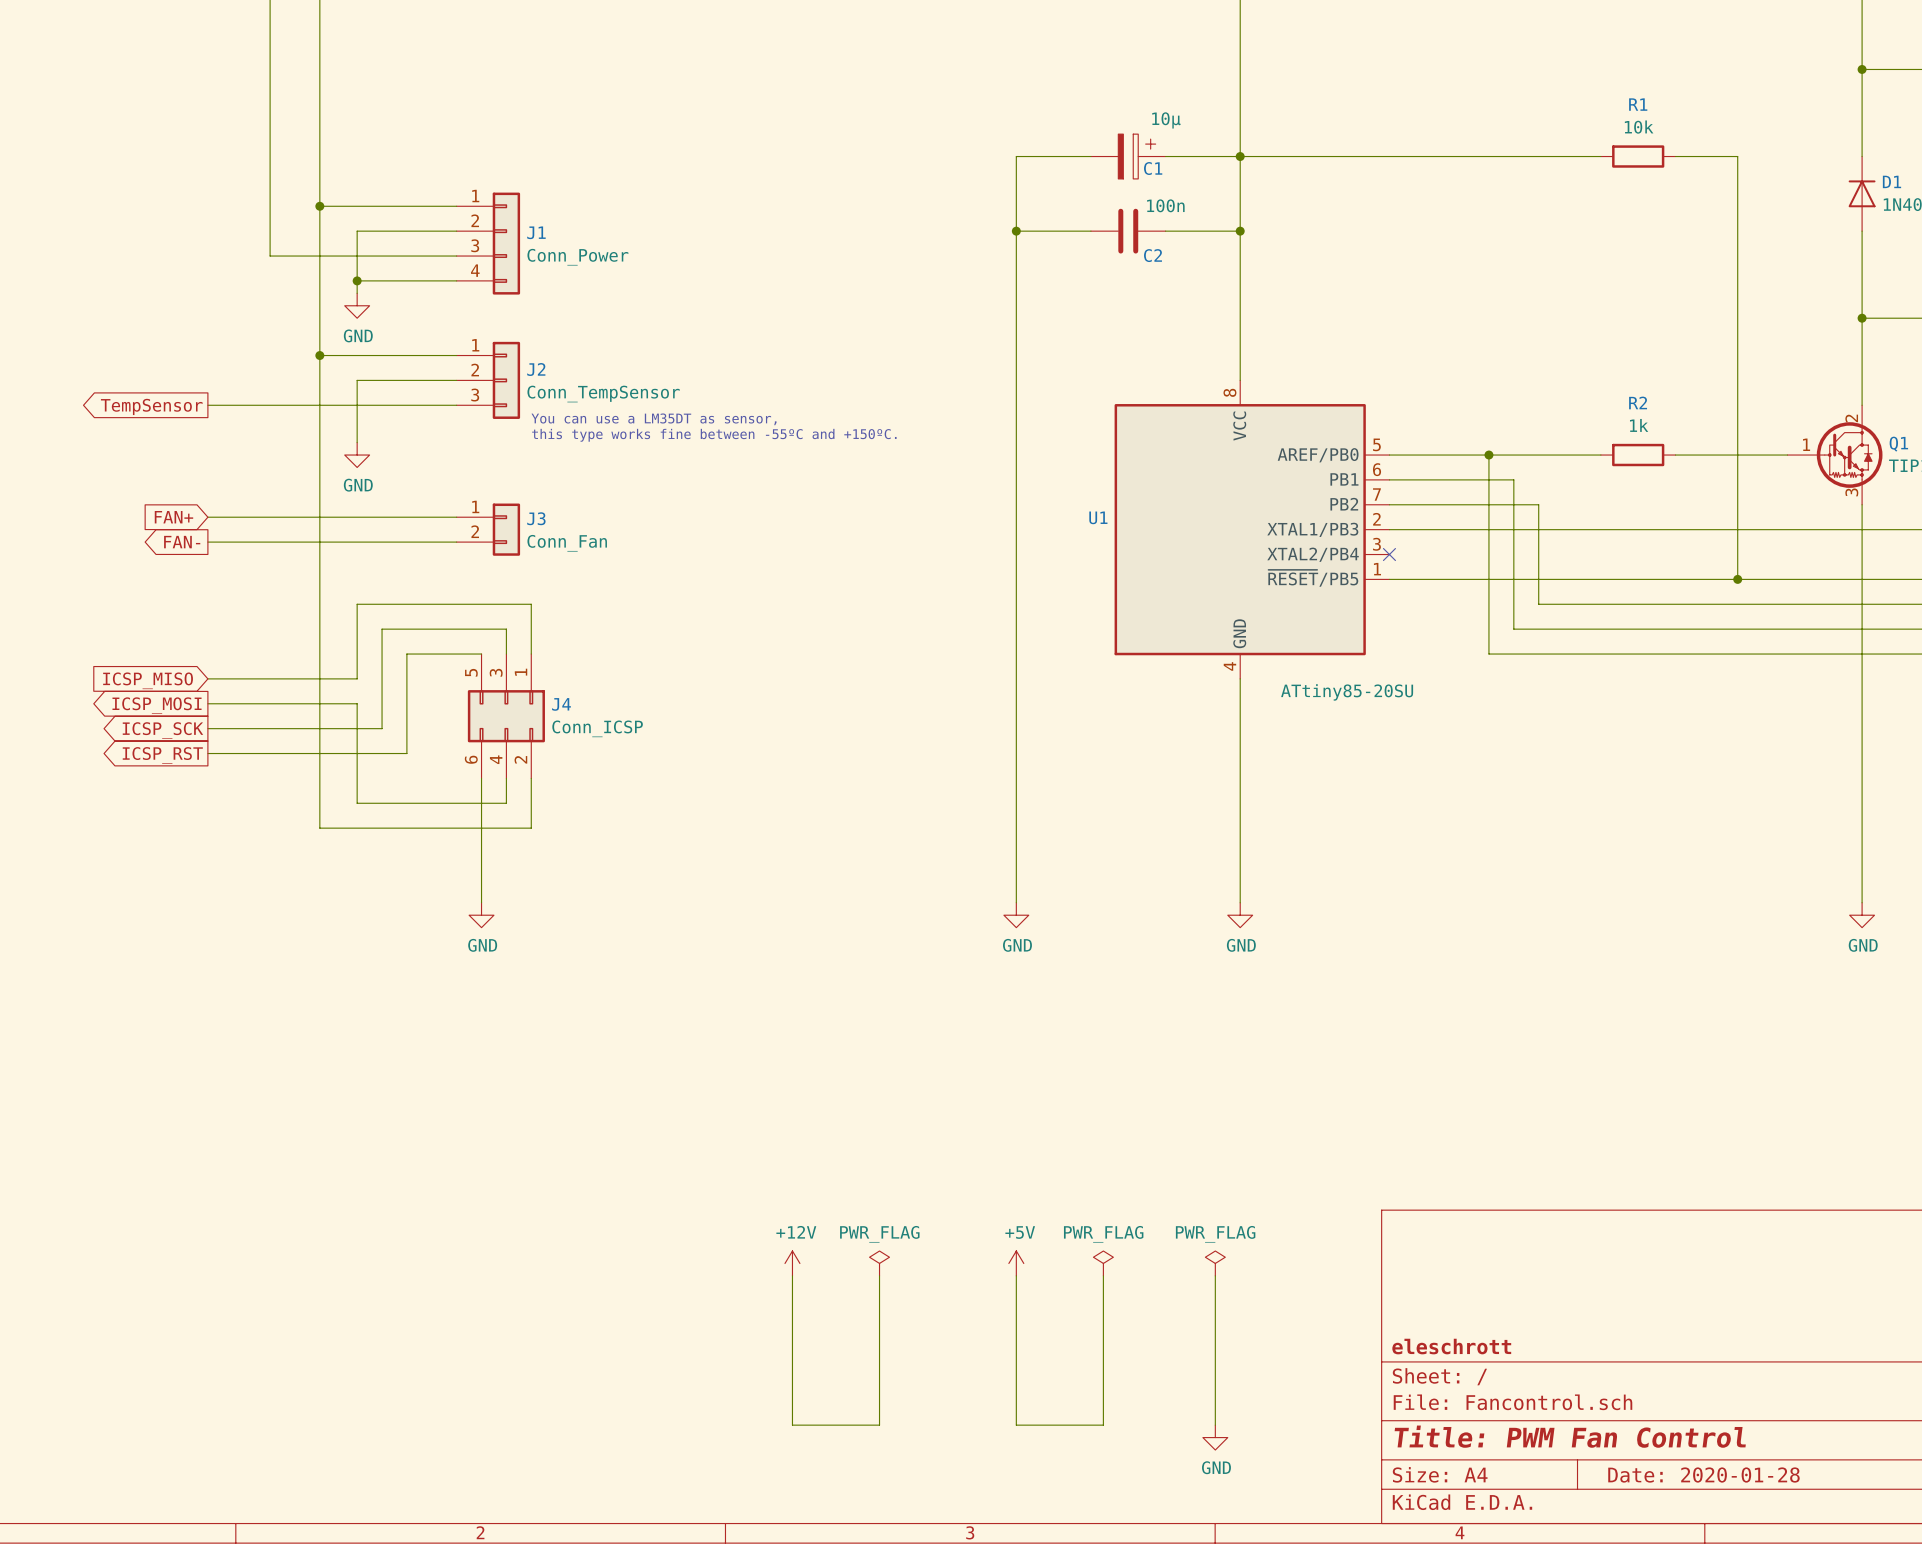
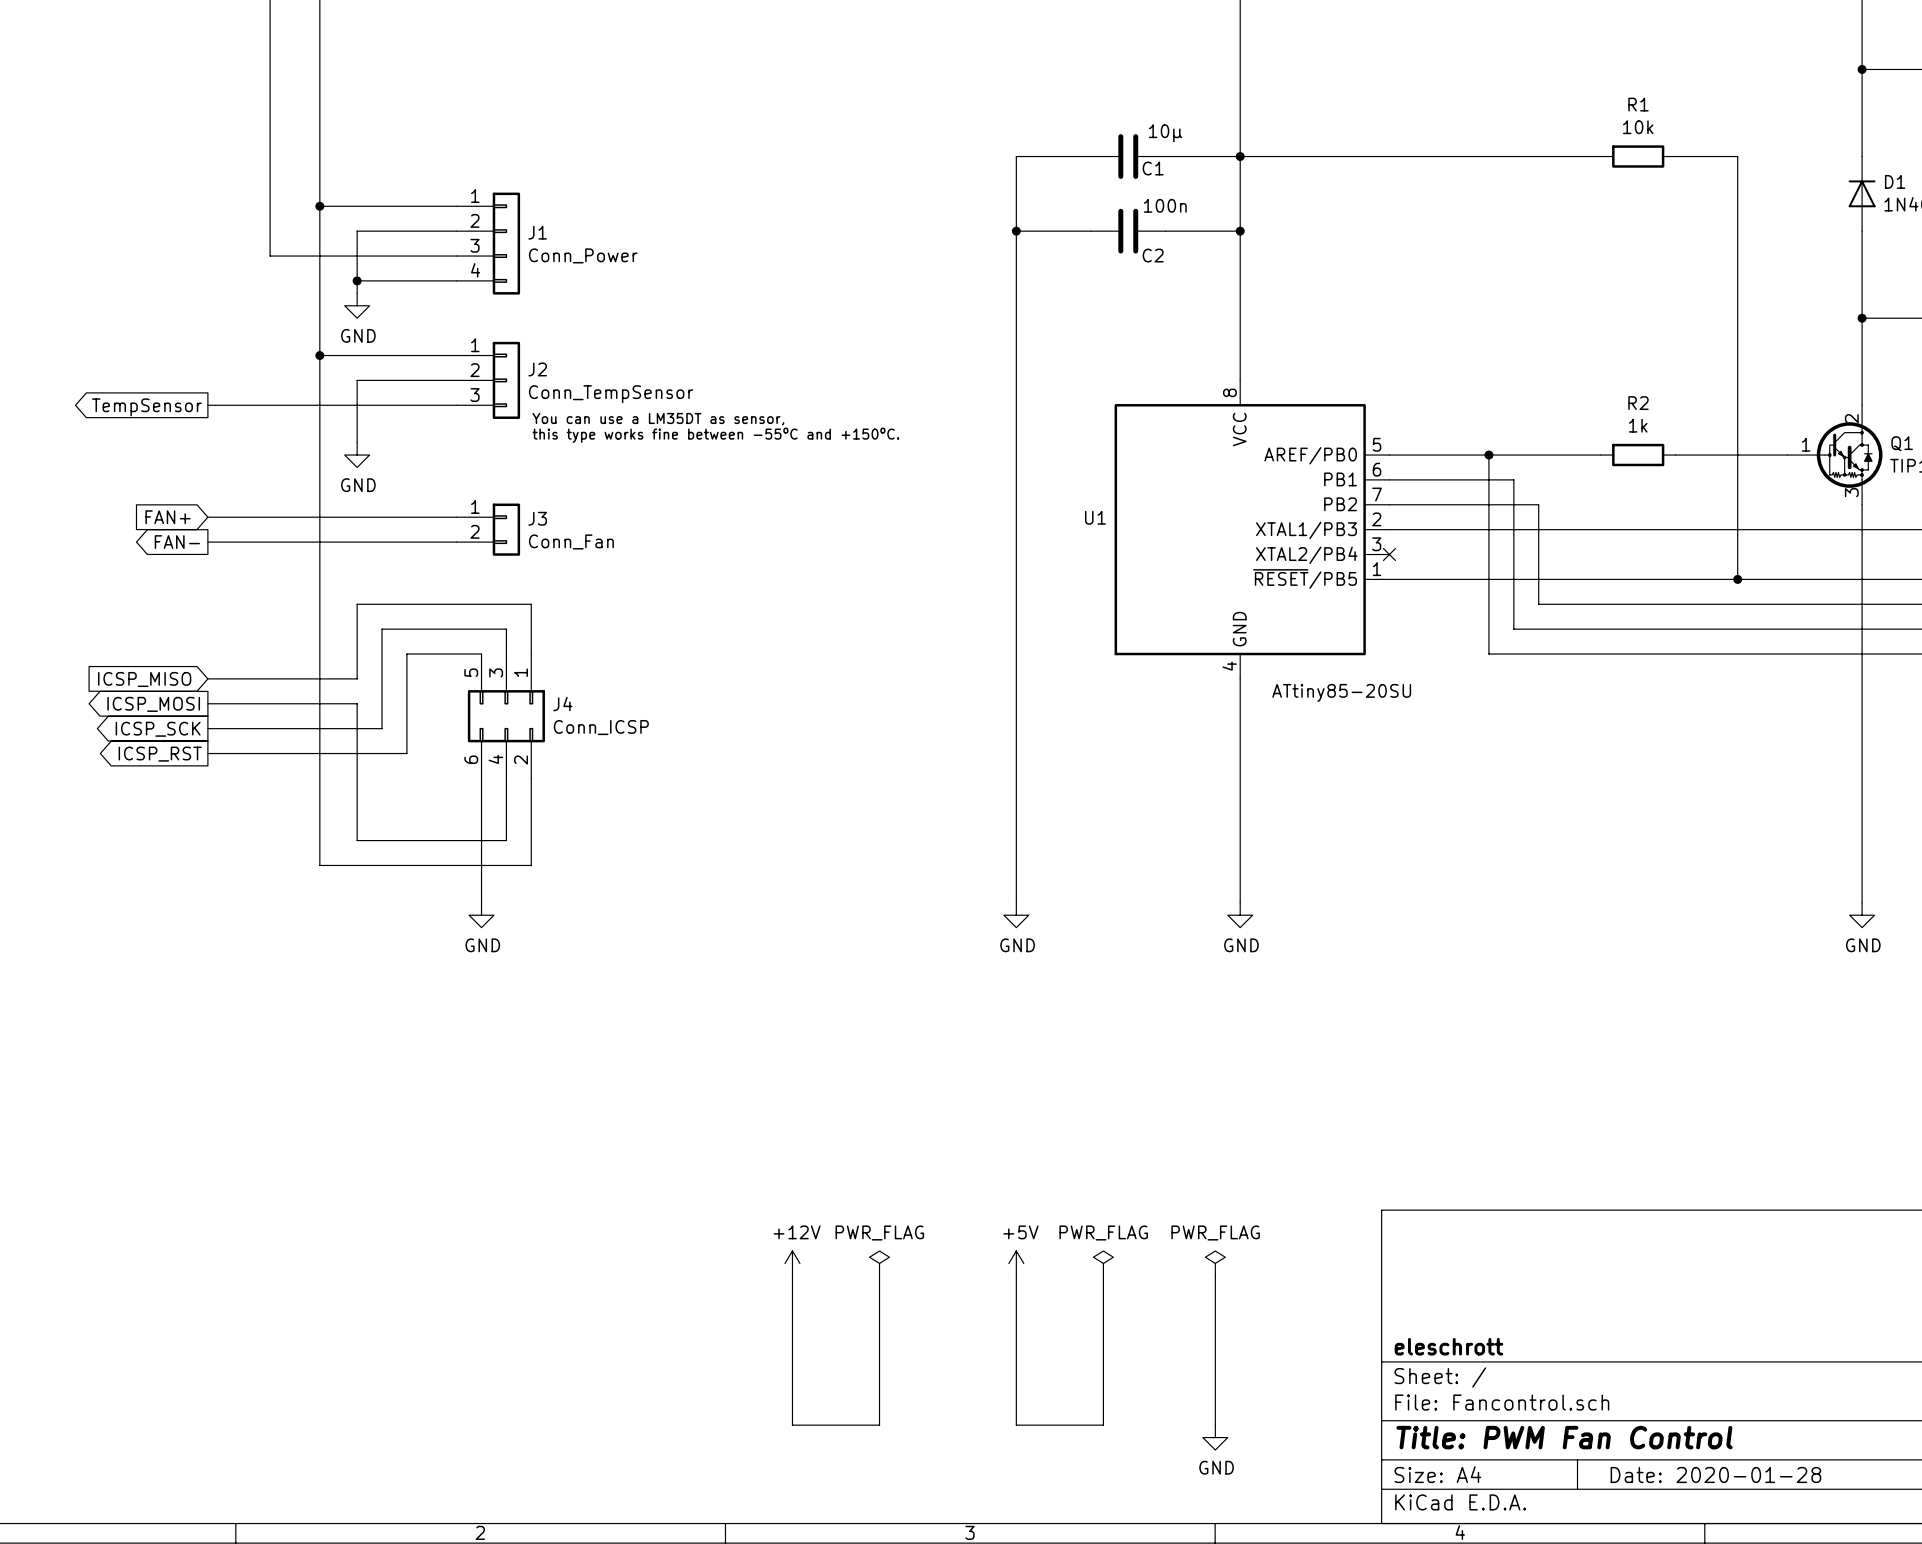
C1 symbol: [1090, 134, 1166, 179] -> [1090, 134, 1166, 179]
wire: (357, 803) (506, 803) -> (357, 803) (357, 840) (506, 840) (506, 803)
wire: (319, 828) (531, 828) -> (319, 828) (319, 865) (531, 865) (531, 828)

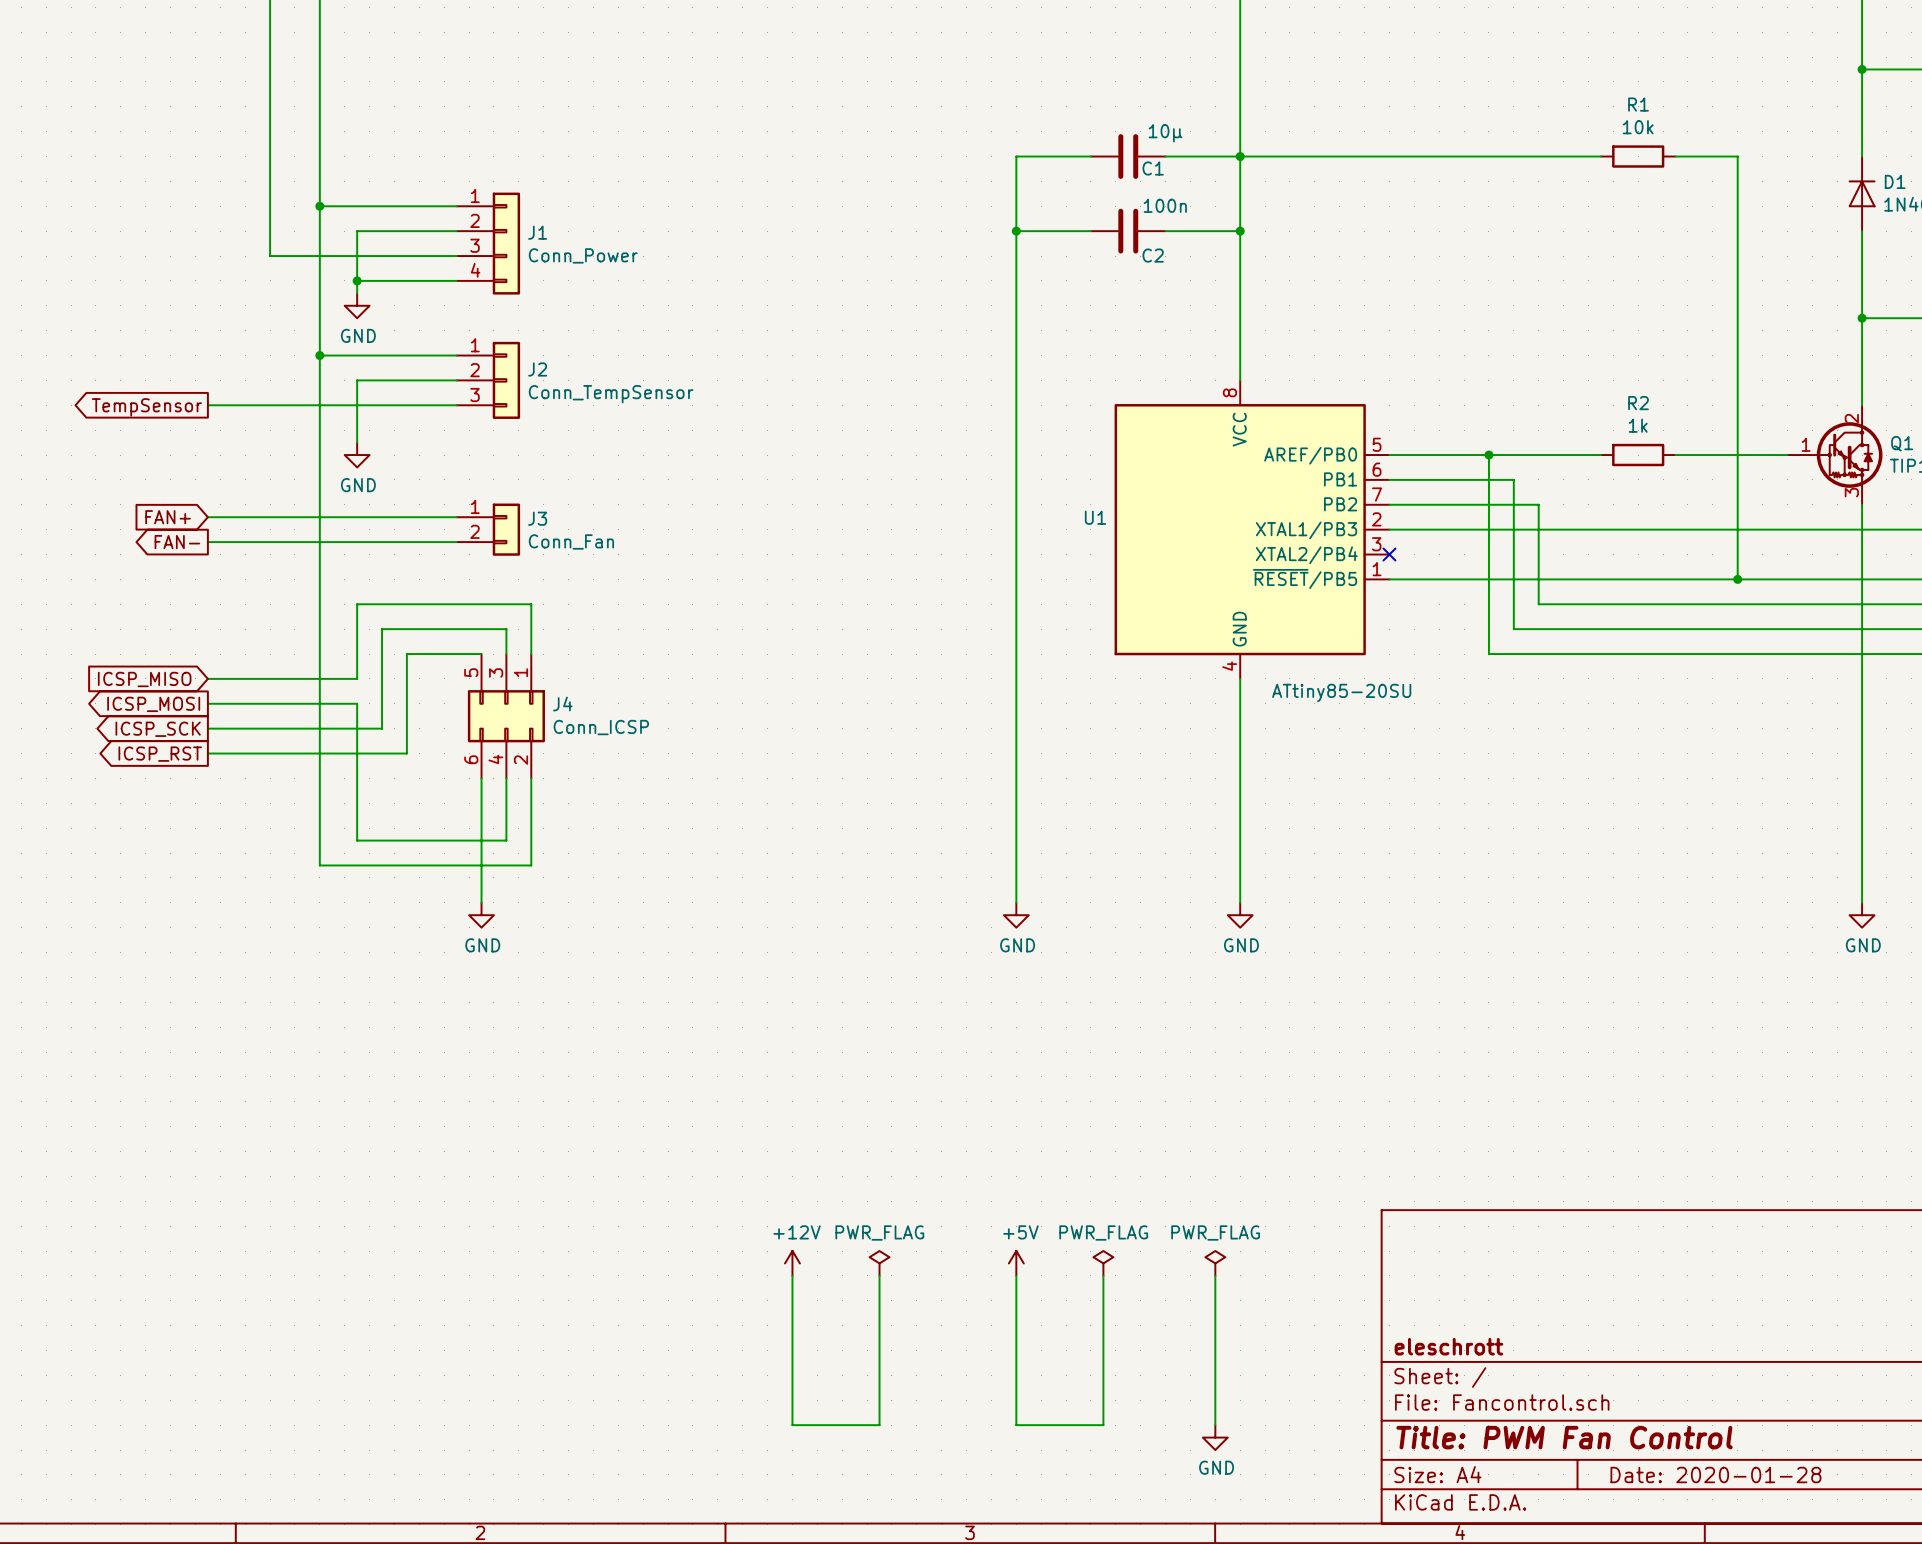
text: You can use a LM35DT as sensor, (658, 419) -> none
text: this type works fine between -55ºC and +150ºC. (715, 435) -> none

